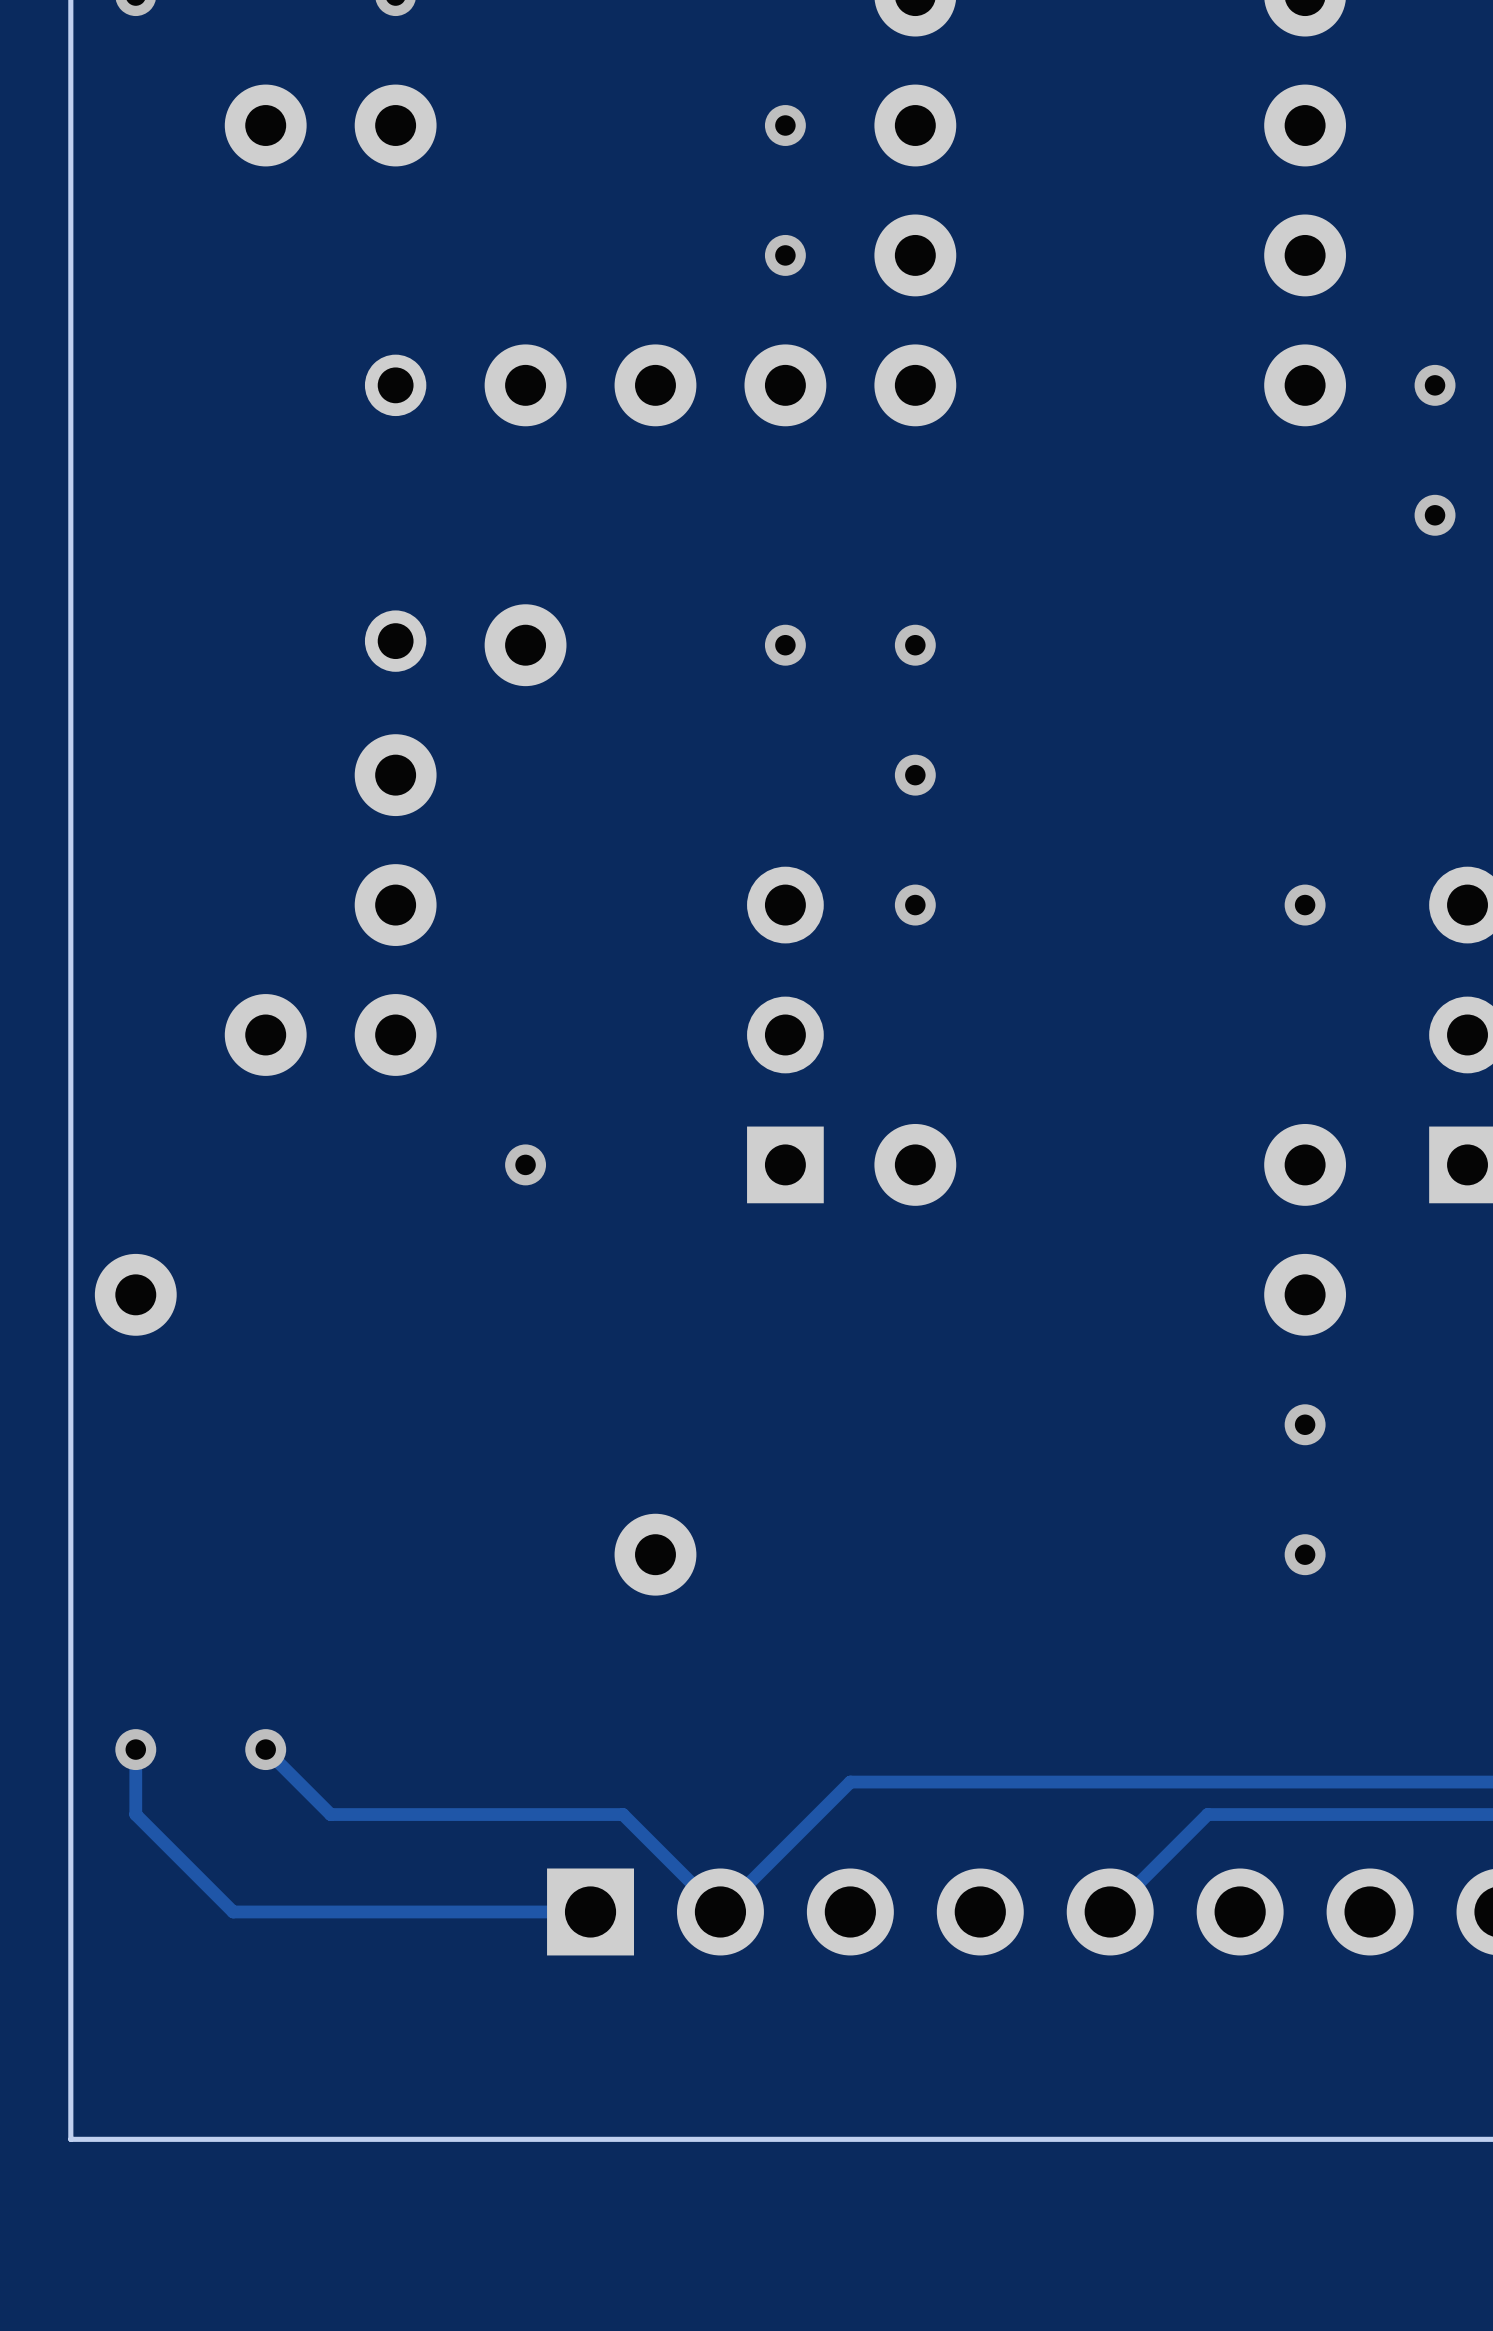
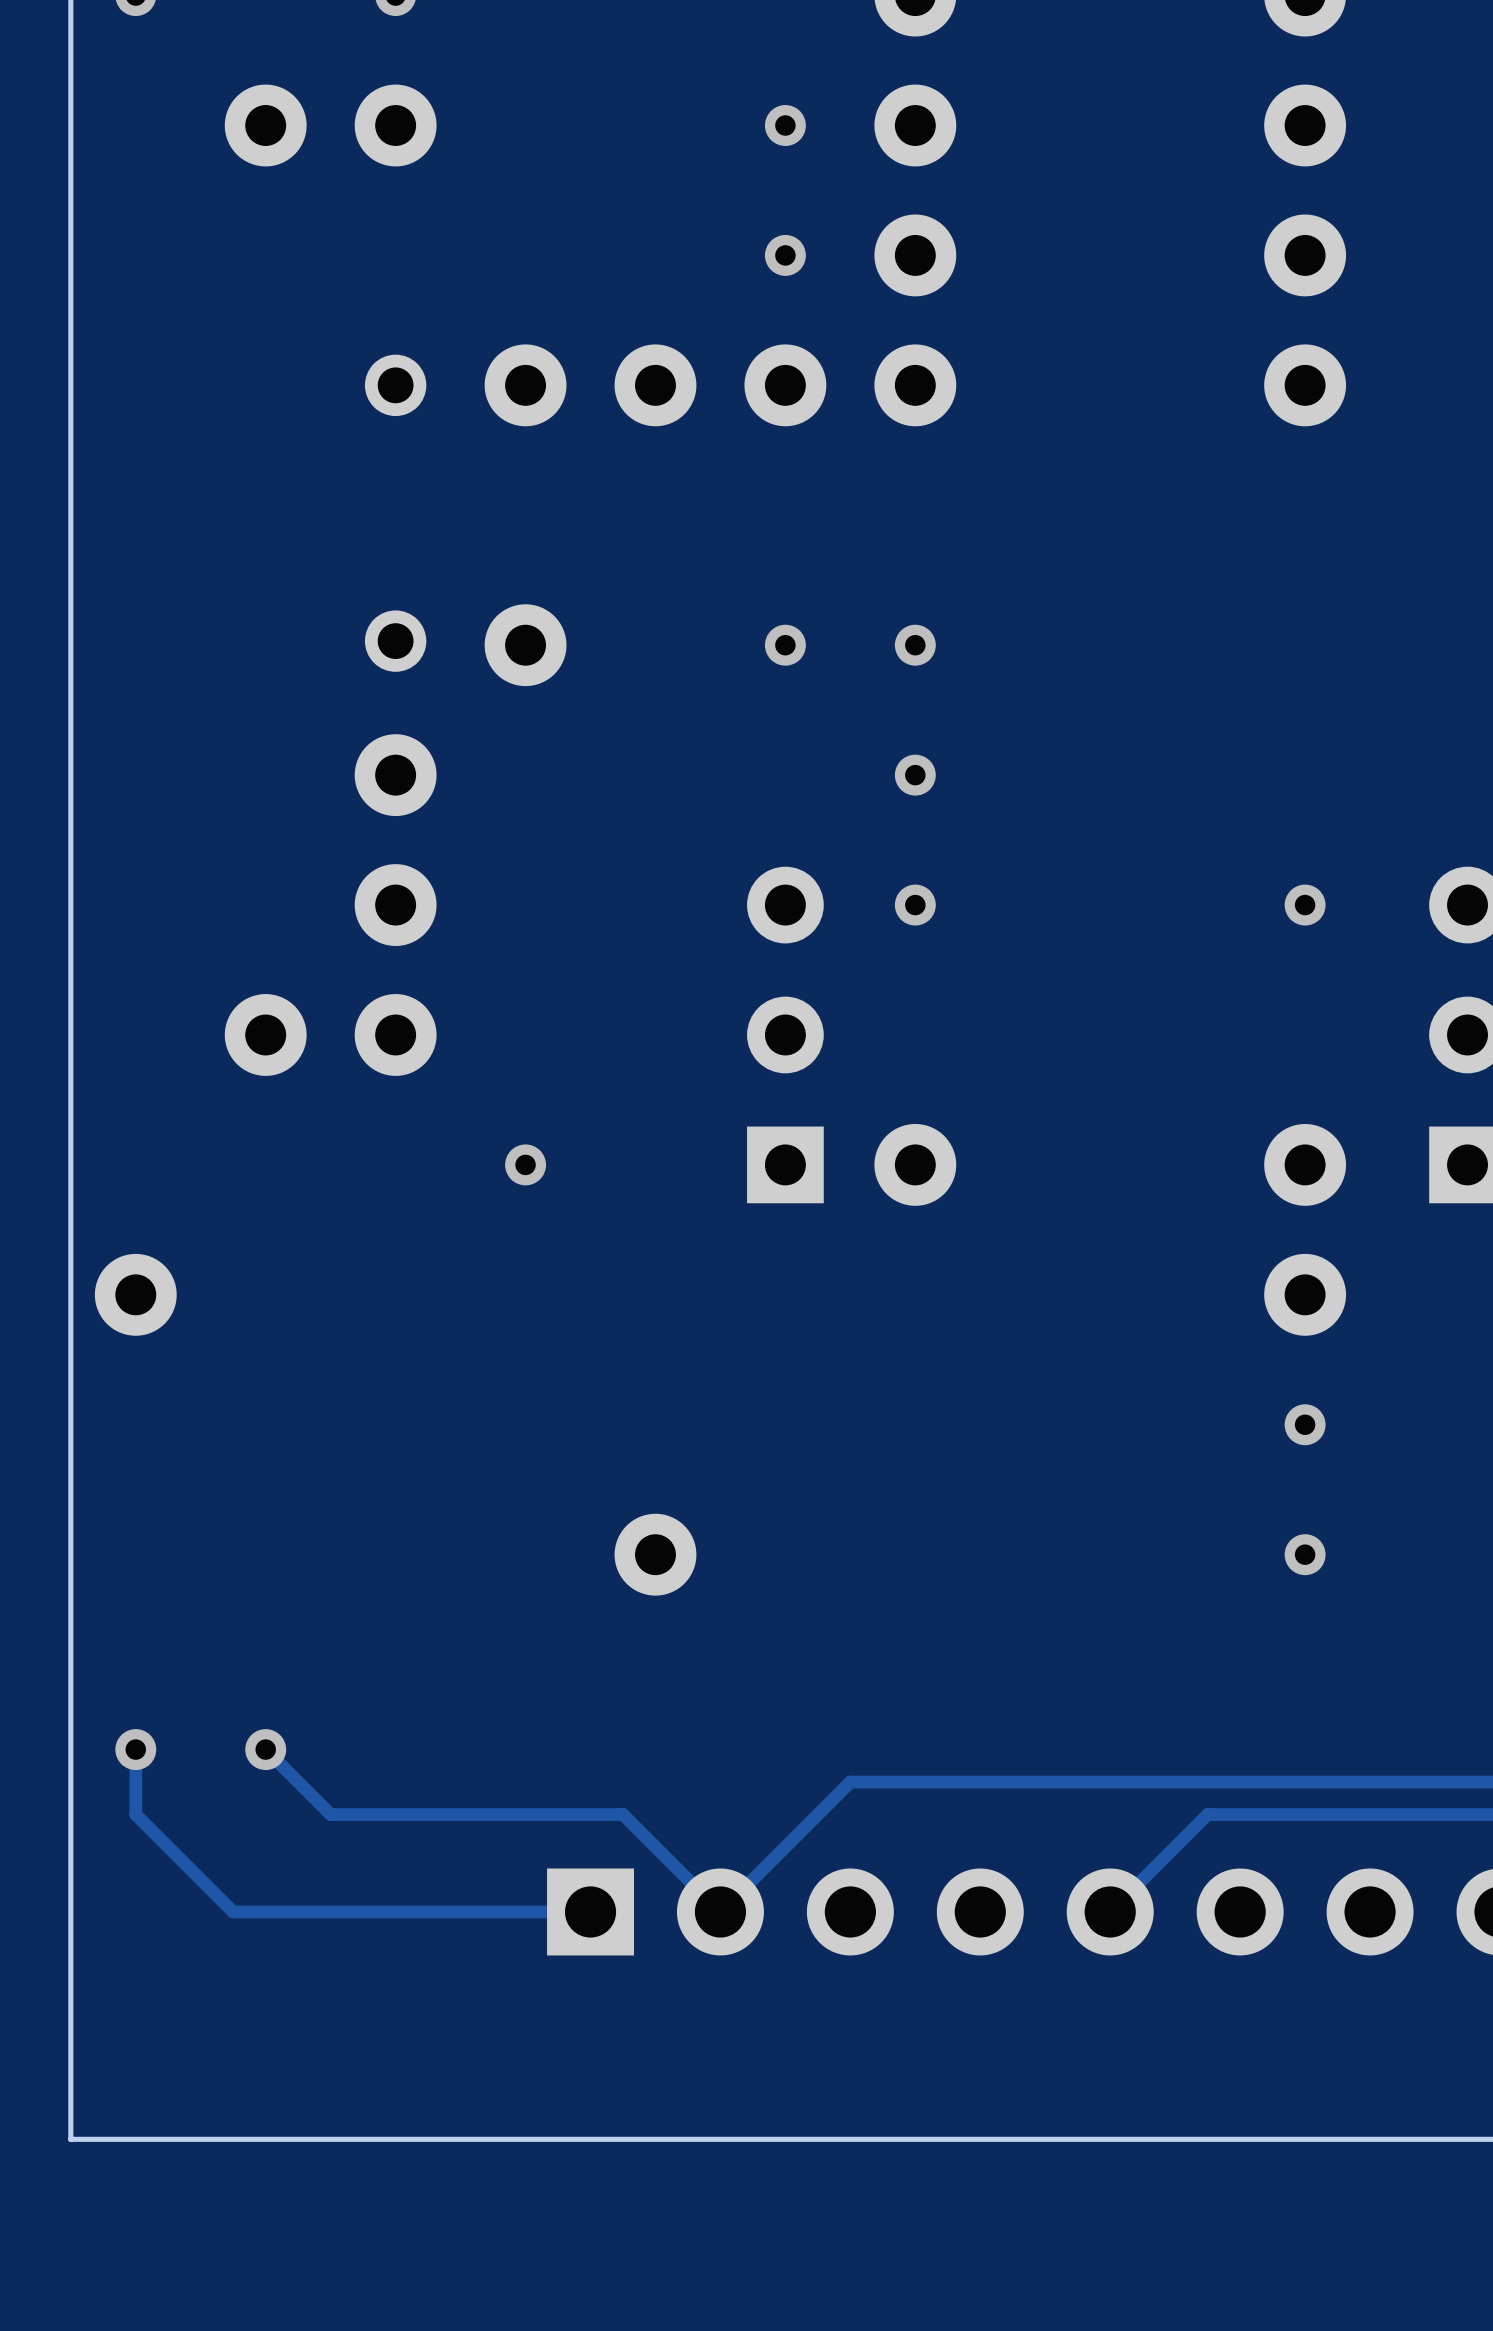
via: (1435, 385) -> none
via: (1435, 515) -> none

